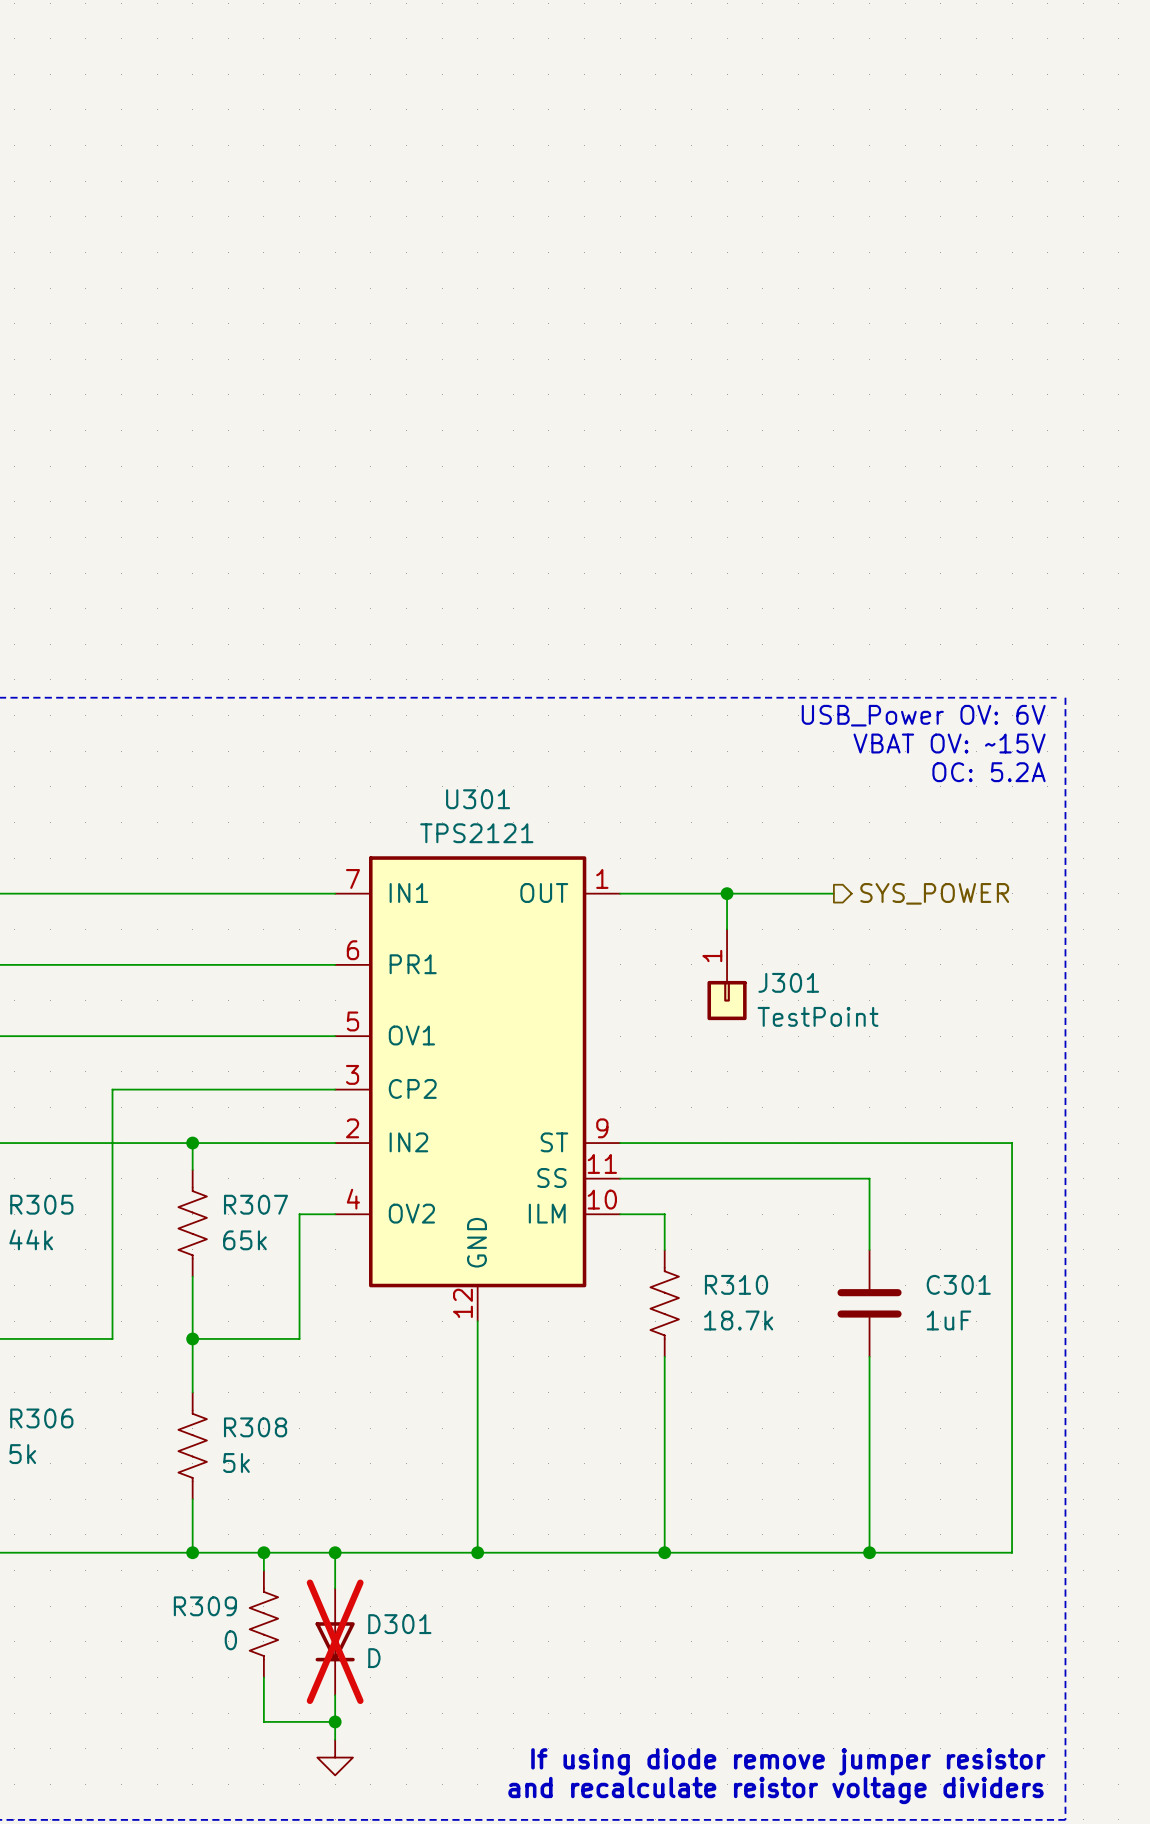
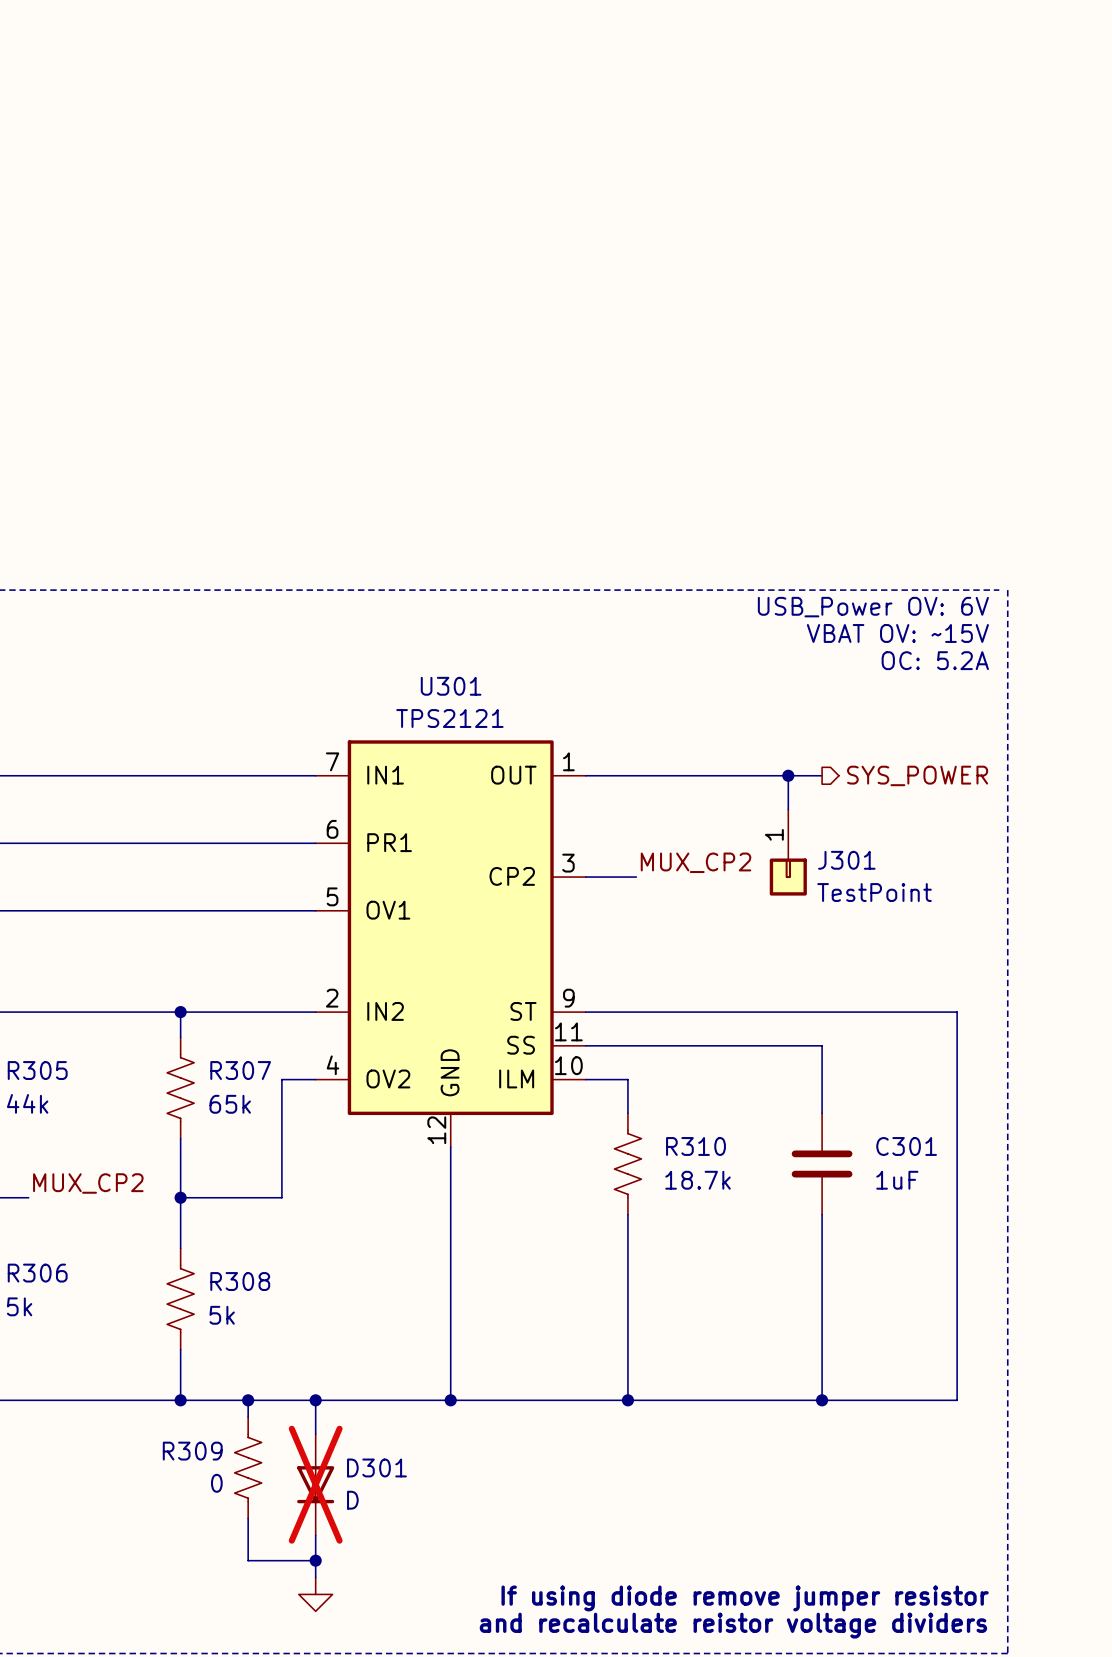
U301 symbol: [335, 856, 621, 1322] -> [315, 740, 586, 1148]
wire: (727, 893) (727, 929) -> none
junction: (727, 893) -> none
junction: none -> (788, 775)
wire: none -> (822, 775) (788, 775) (788, 809)
hierarchical label position: SYS_POWER (934, 893) -> SYS_POWER (917, 775)
J301 position: (727, 974) -> (788, 852)
label: none -> MUX_CP2 (696, 862)
wire: none -> (585, 877) (636, 877)
wire: (335, 1089) (112, 1089) (112, 1338) (32, 1338) -> none
label: none -> MUX_CP2 (88, 1183)

